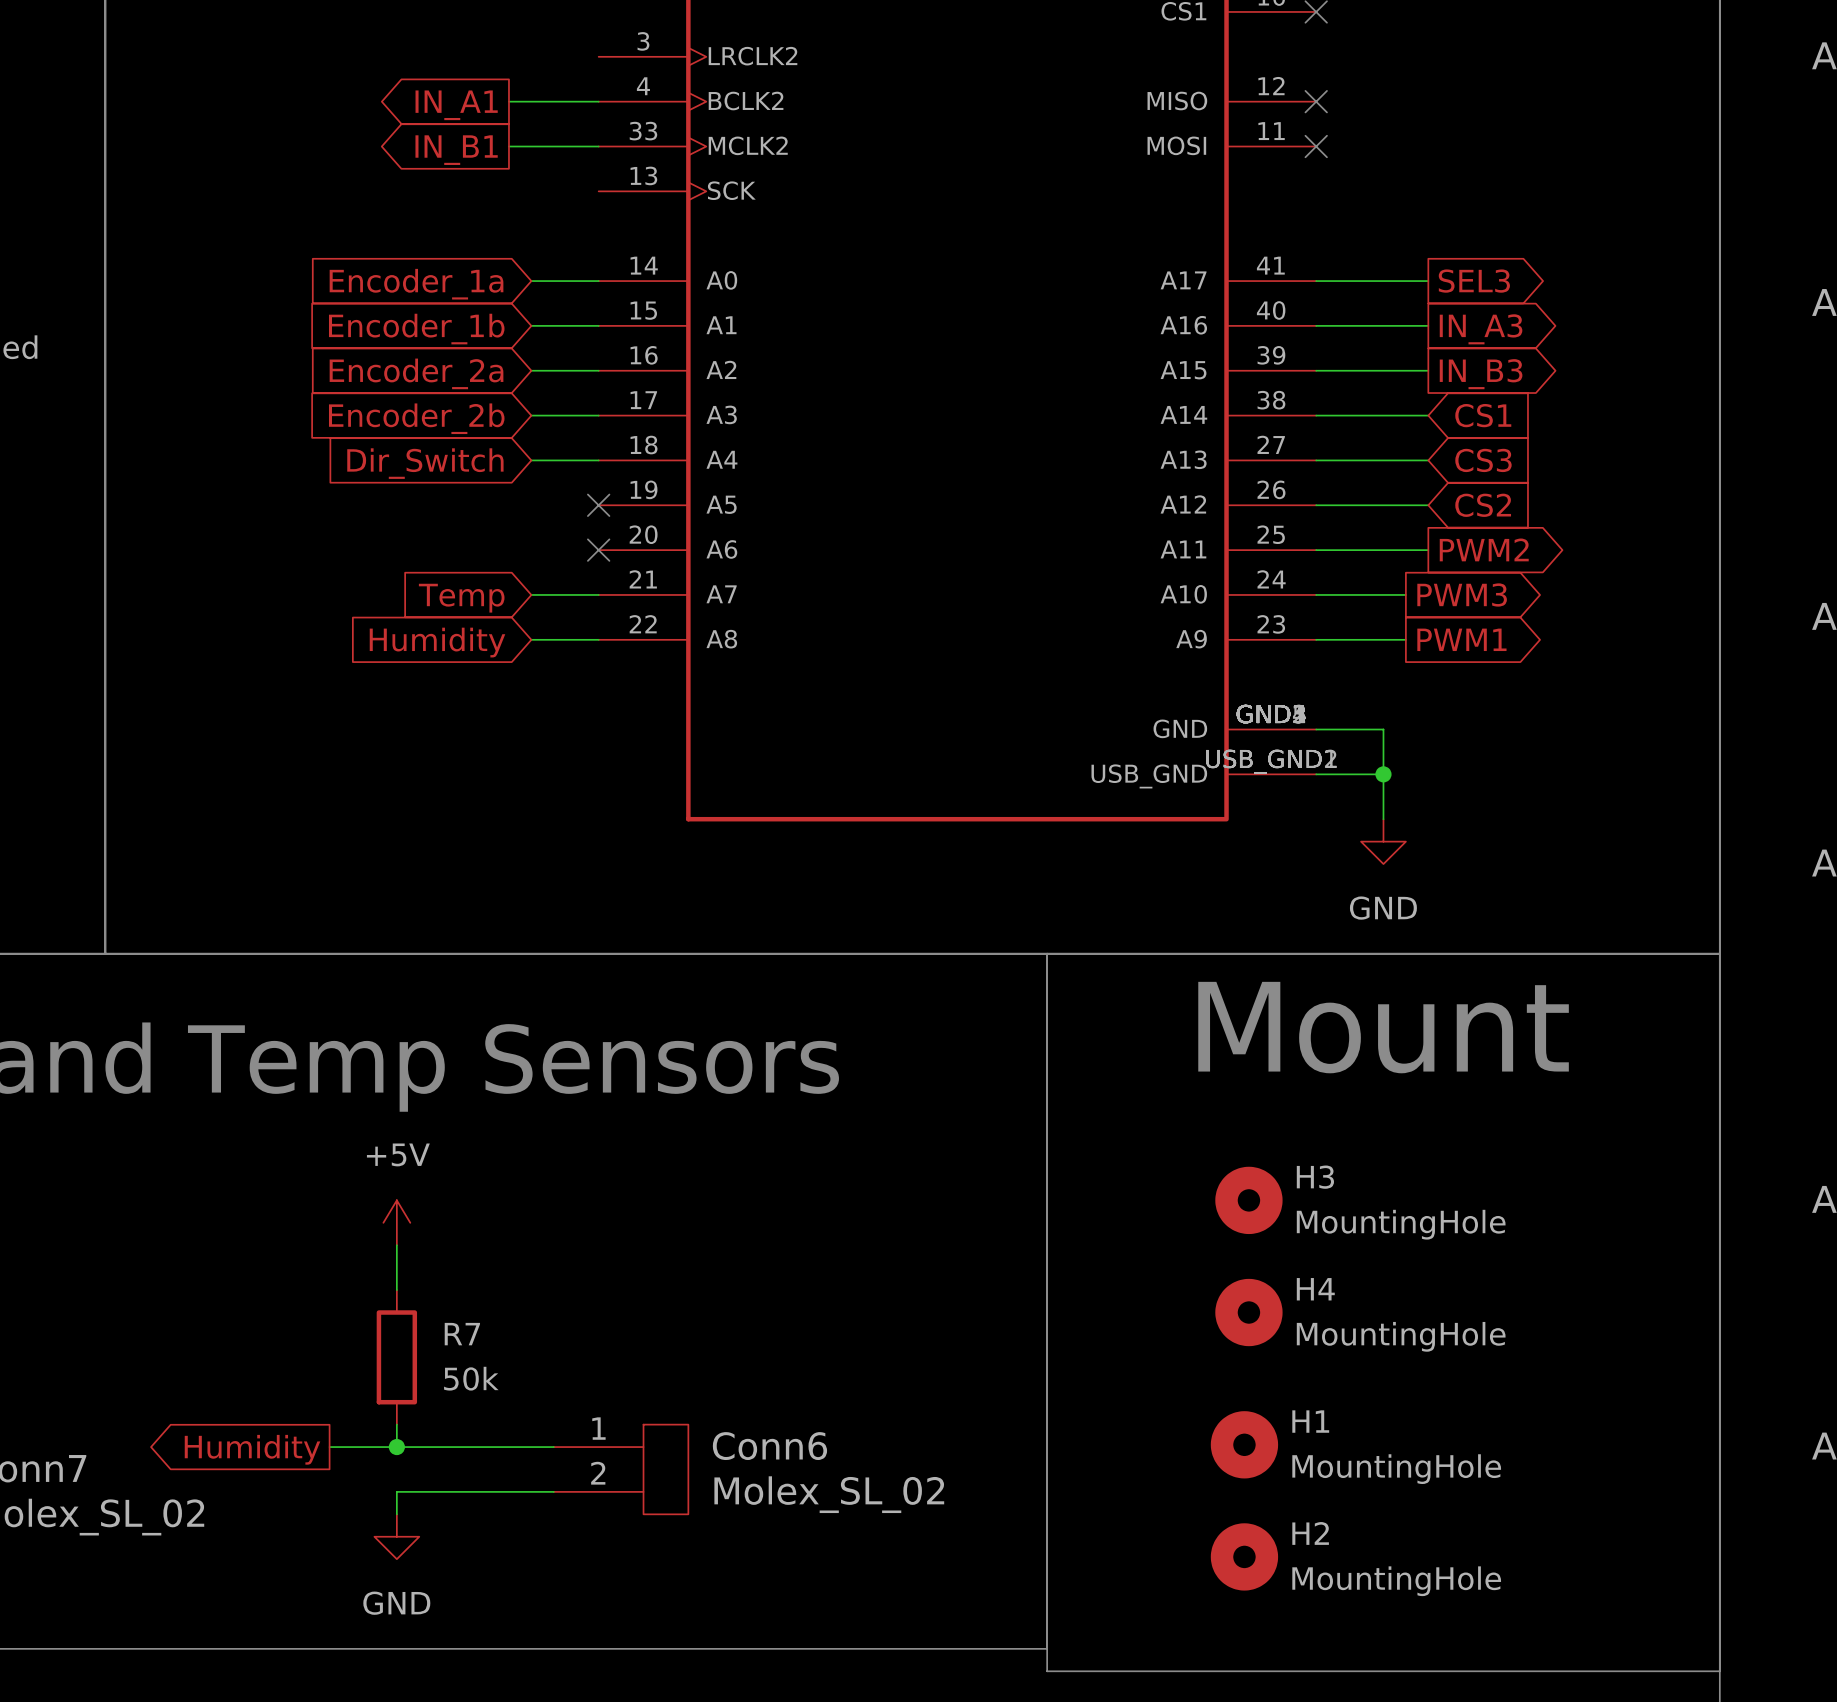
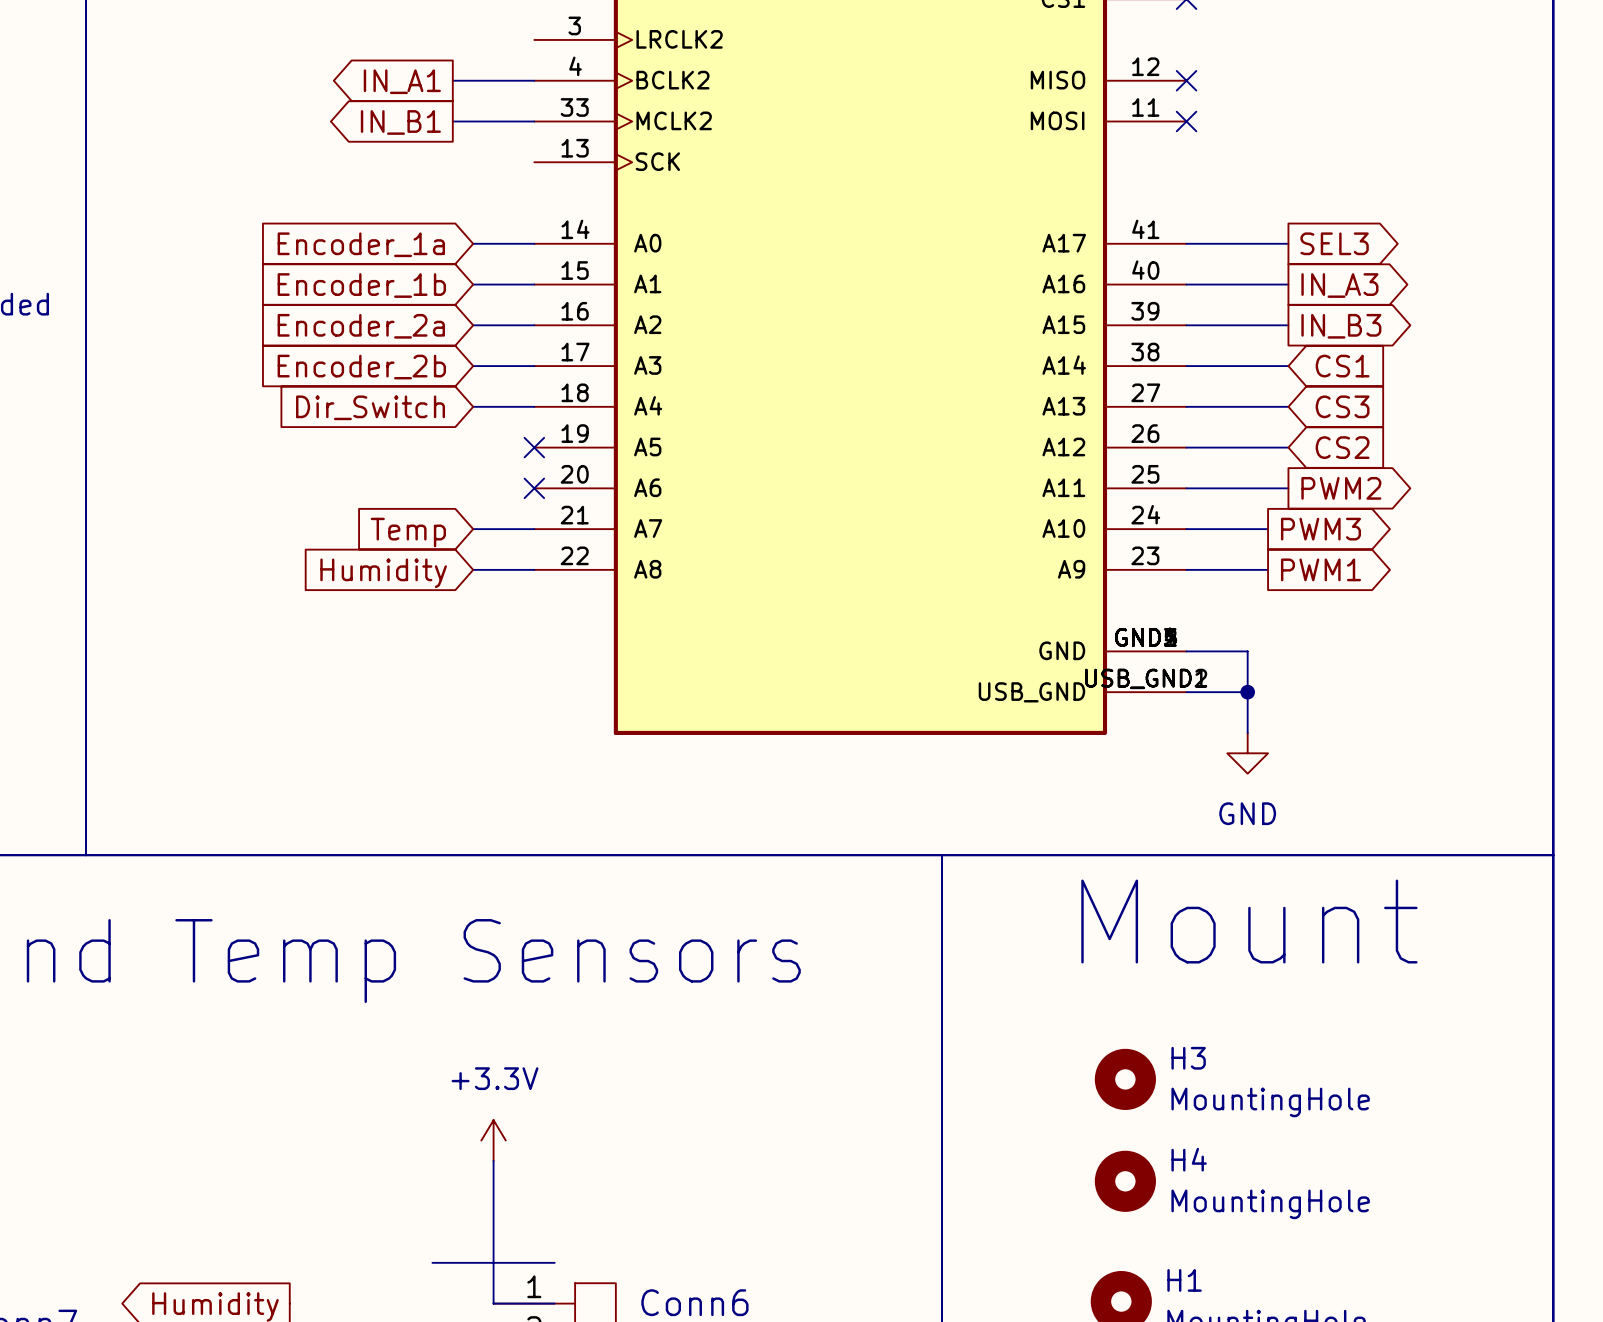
power symbol: +5V (396, 1222) -> none
wire: (396, 1245) (396, 1290) -> none
power symbol: none -> +3.3V (493, 1140)
wire: none -> (493, 1160) (493, 1303) (554, 1303)
R7: 50k (396, 1357) -> none
wire: none -> (432, 1262) (554, 1262)
wire: (396, 1424) (396, 1447) -> none
wire: (329, 1447) (553, 1447) -> none
junction: (396, 1447) -> none

